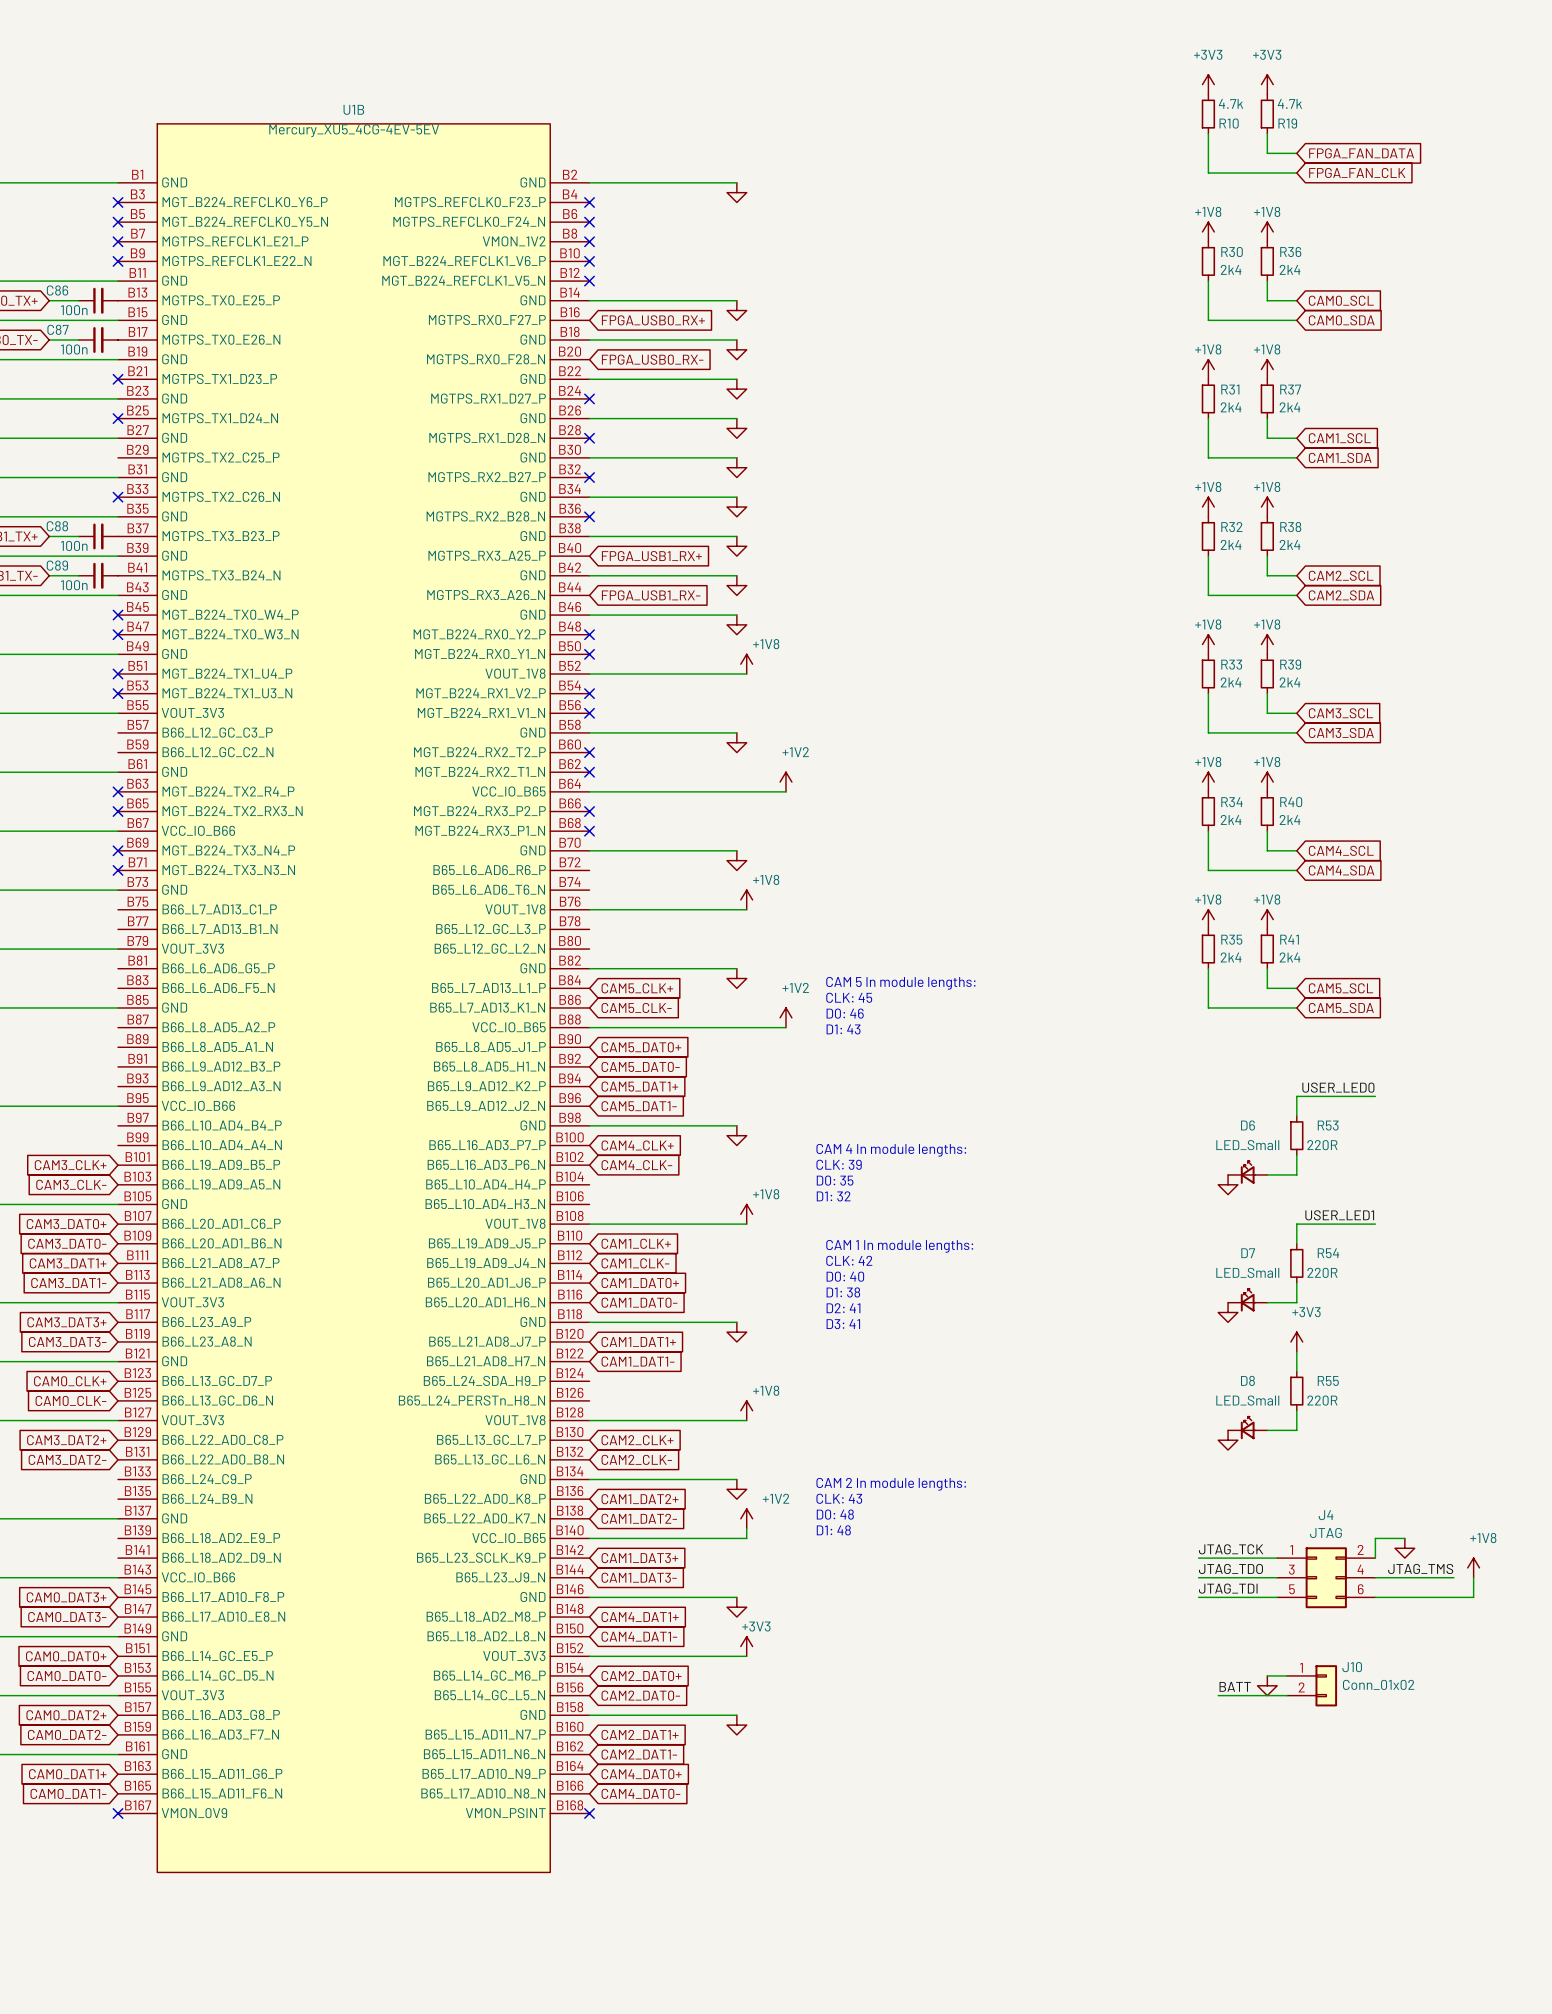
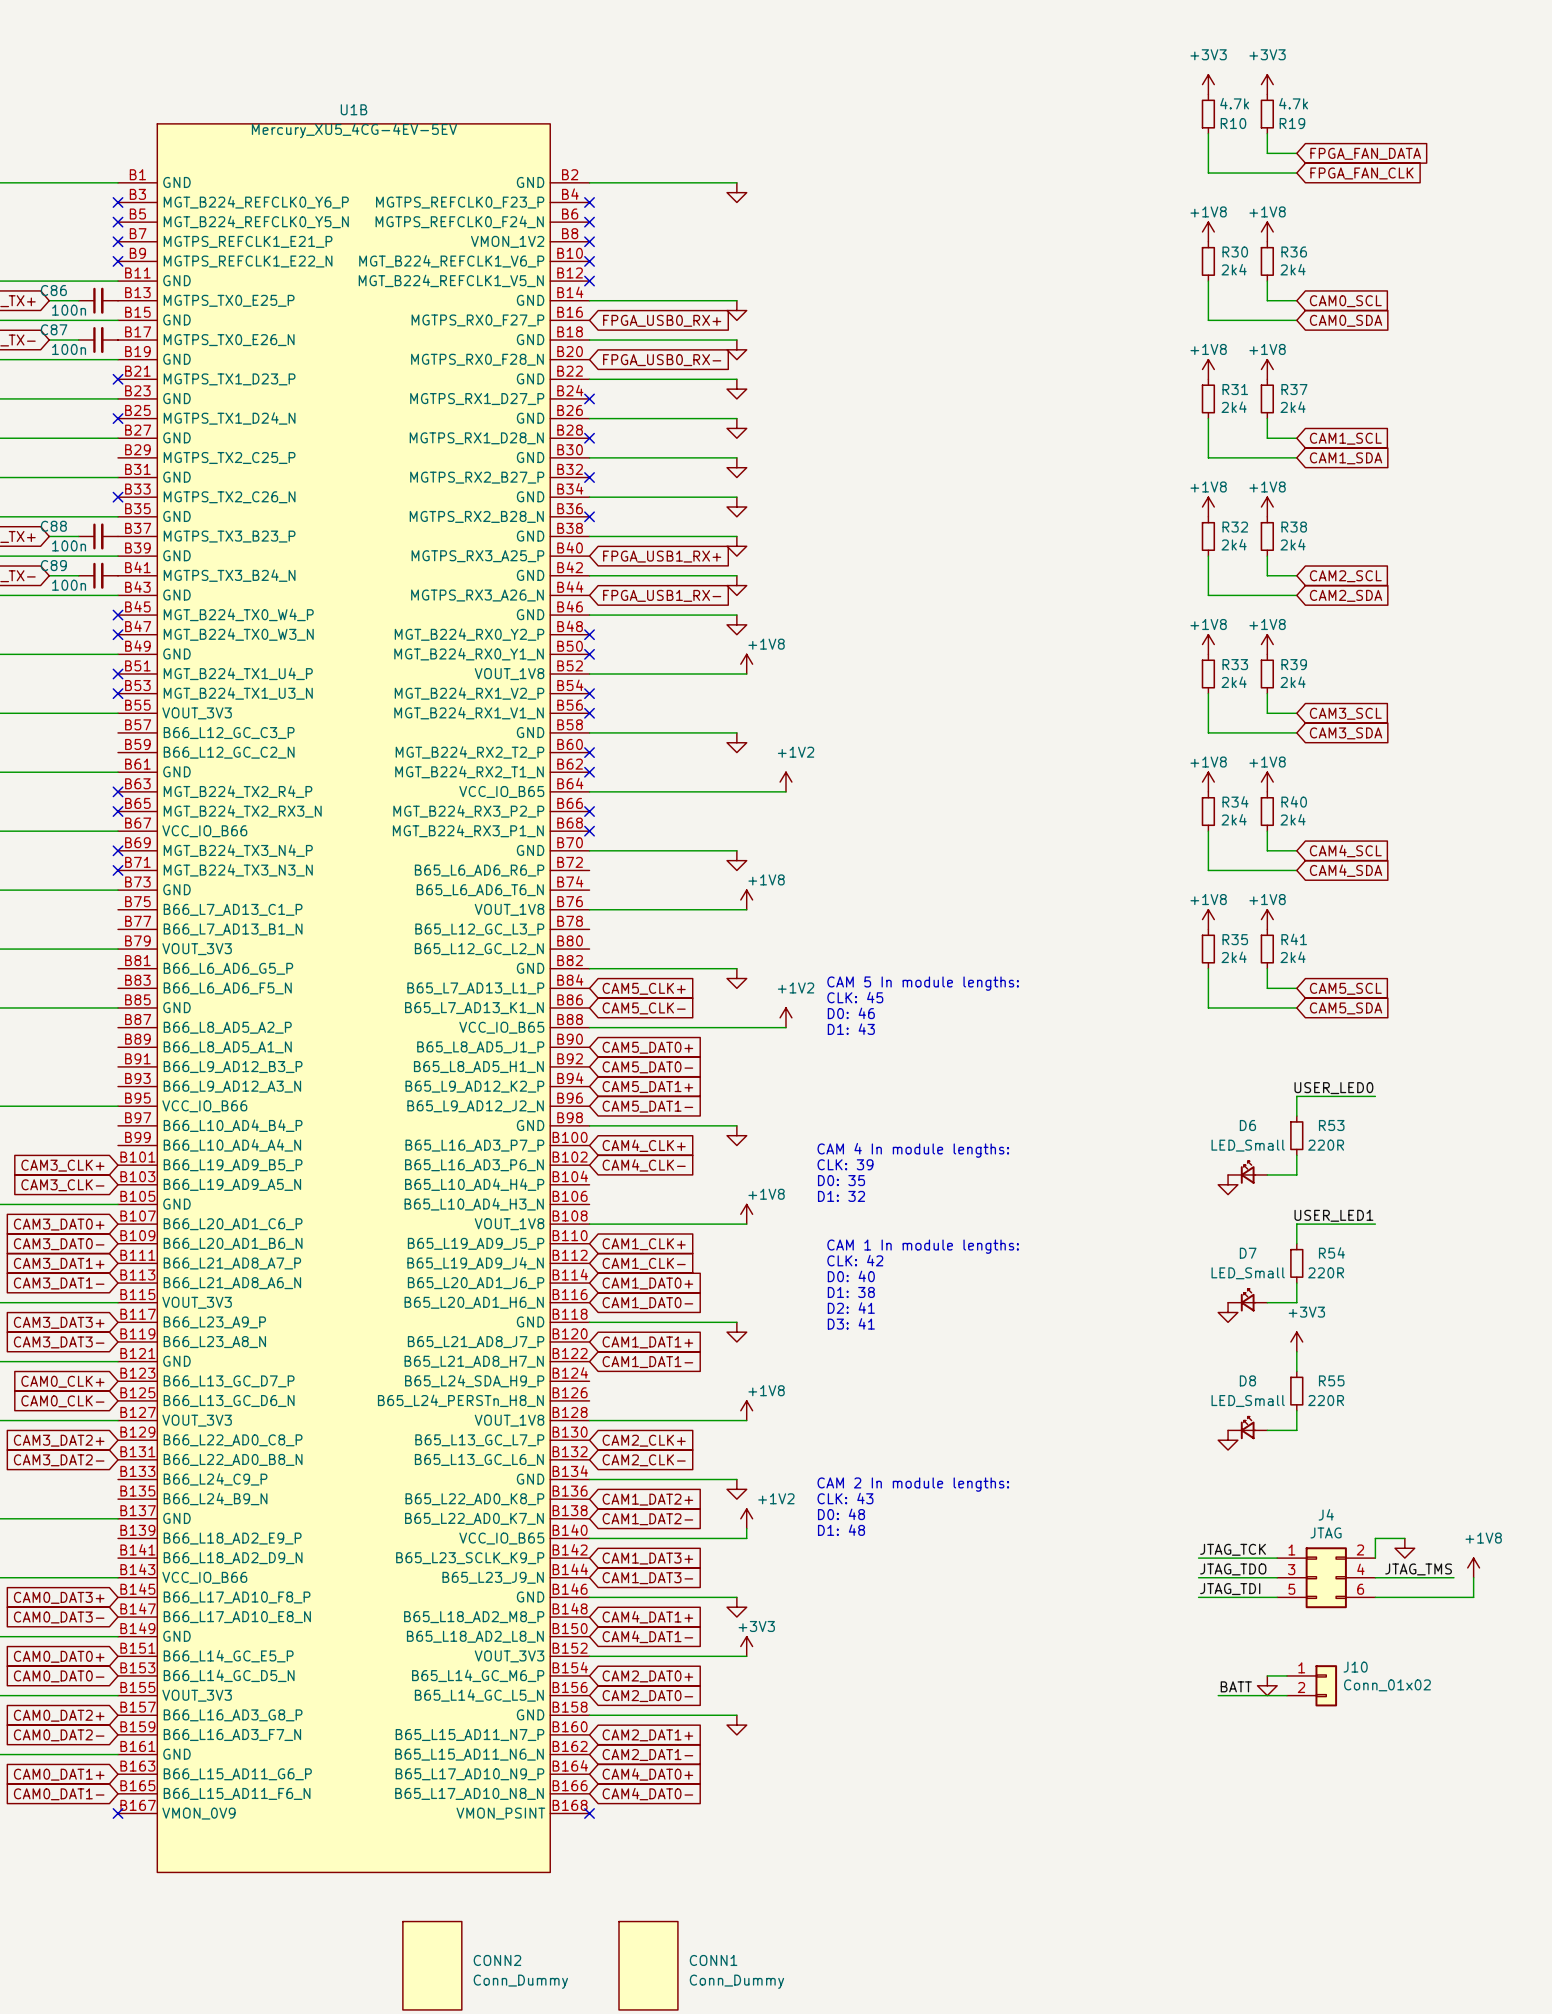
CONN2: none -> Conn_Dummy (432, 1965)
CONN1: none -> Conn_Dummy (648, 1965)

